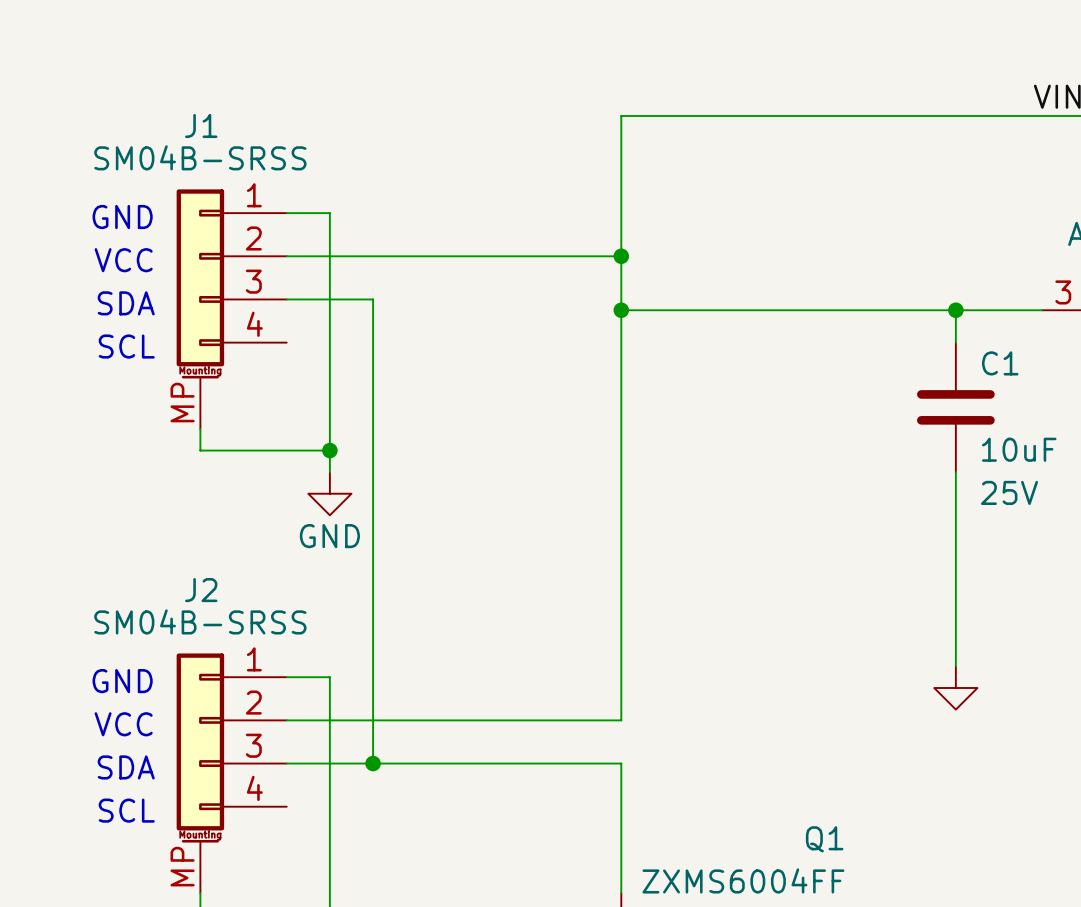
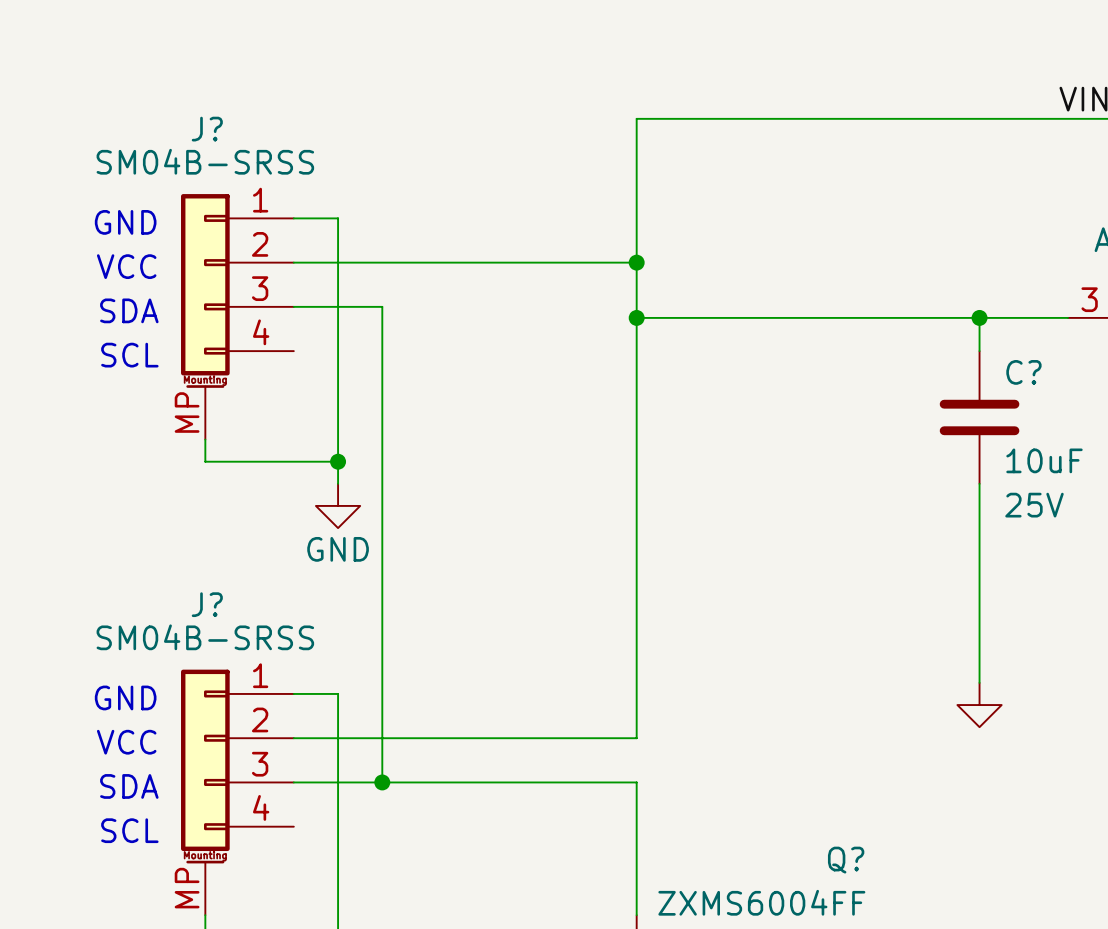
J1 name: J1 (201, 125) -> J? (207, 129)
C1 name: C1 (1000, 363) -> C? (1023, 372)
J2 name: J2 (201, 590) -> J? (207, 604)
Q1 name: Q1 (824, 839) -> Q? (846, 860)

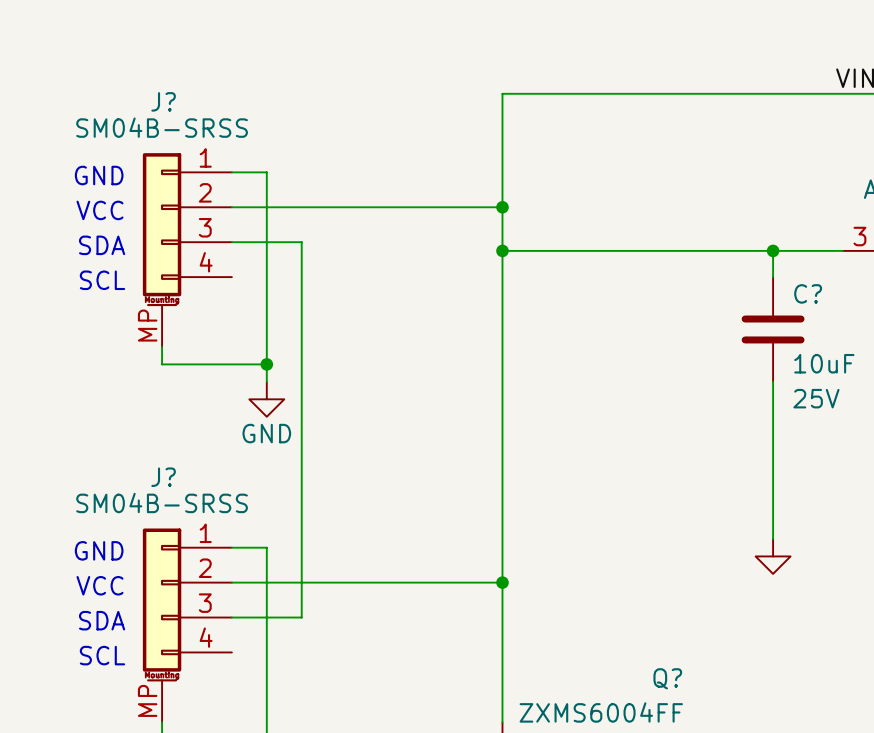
junction: none -> (502, 582)
wire: (382, 782) (636, 782) -> (502, 582) (502, 617)
junction: (382, 782) -> none

